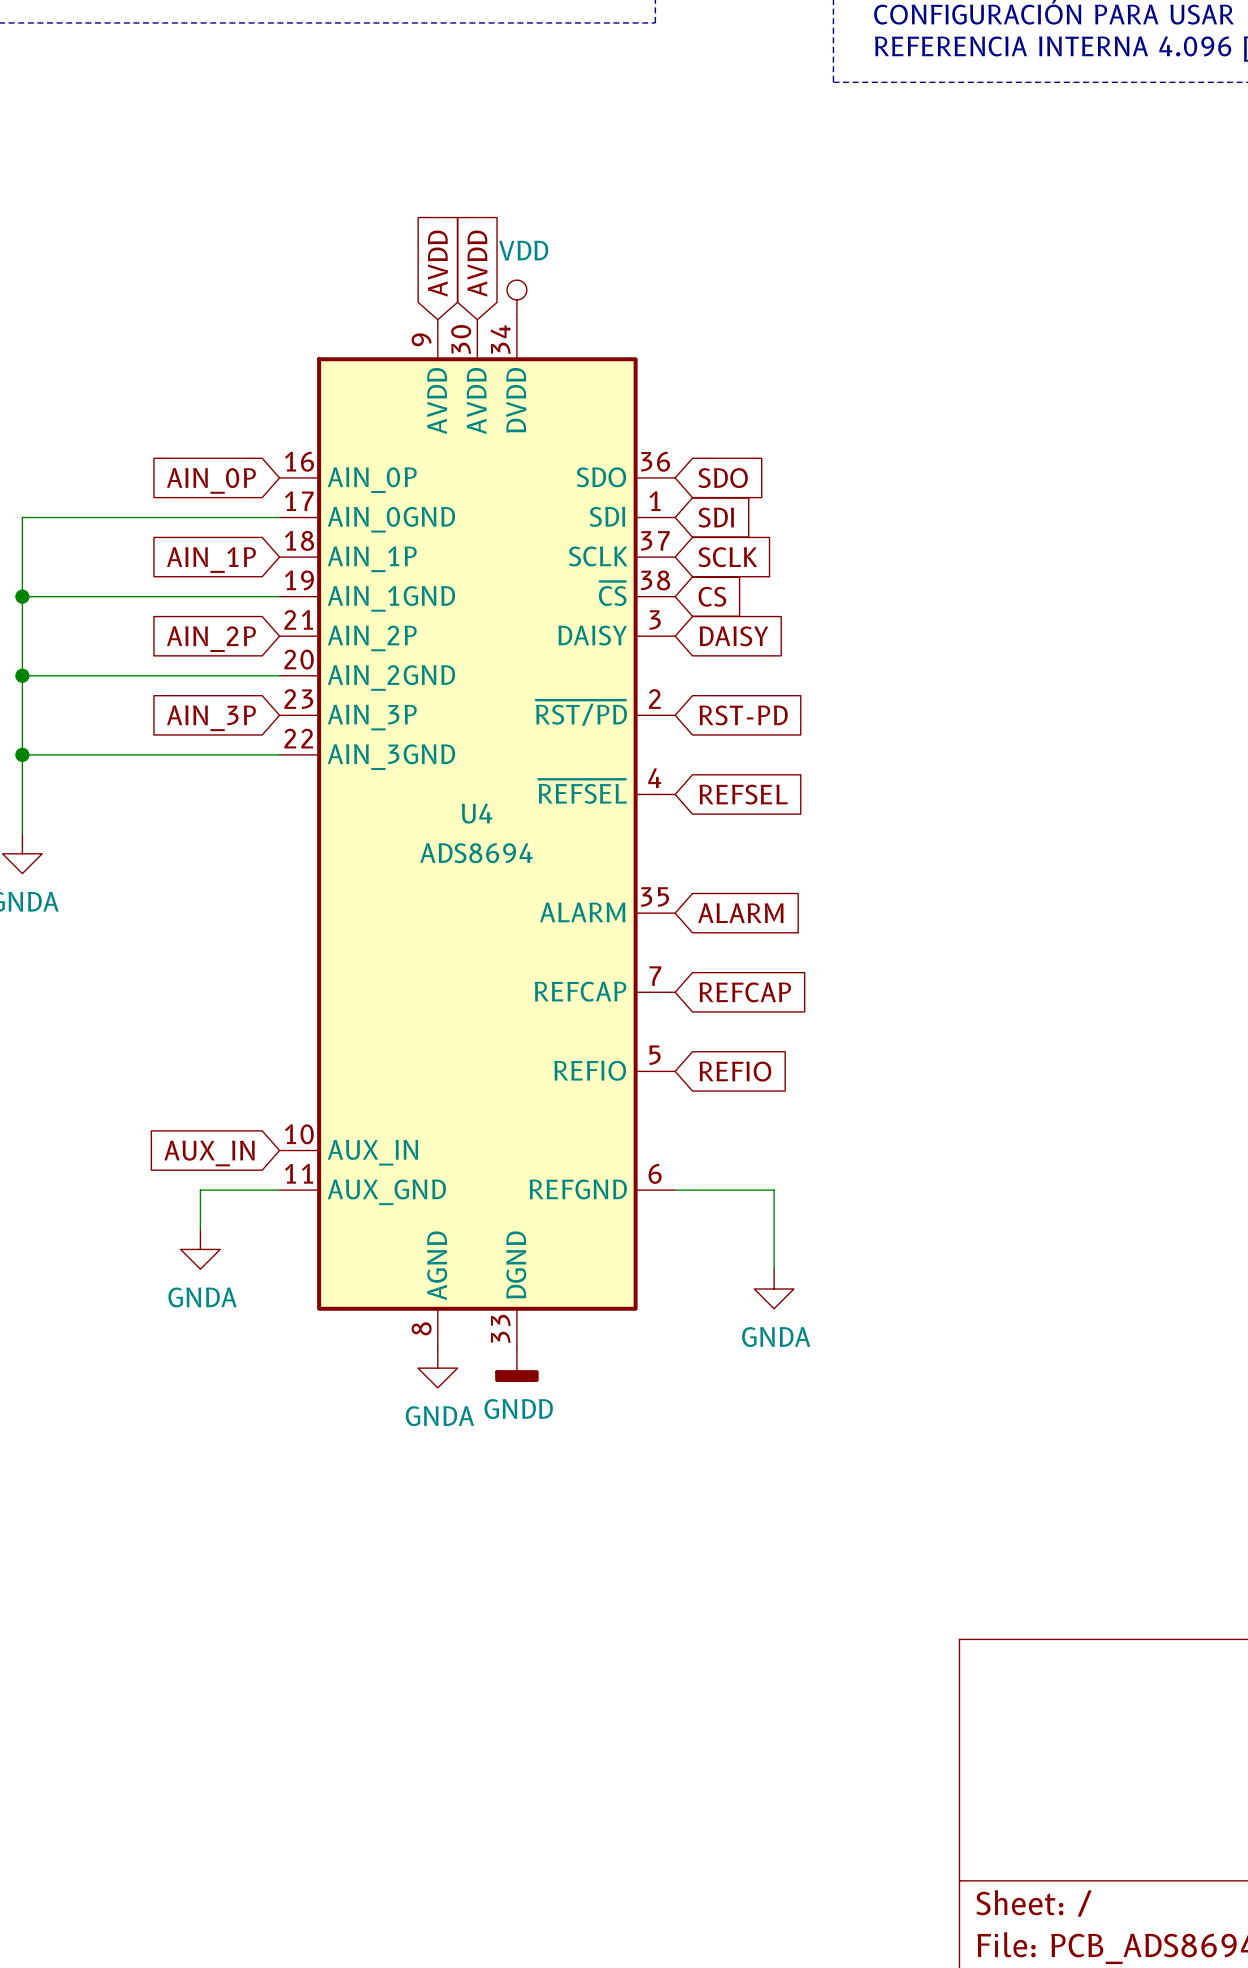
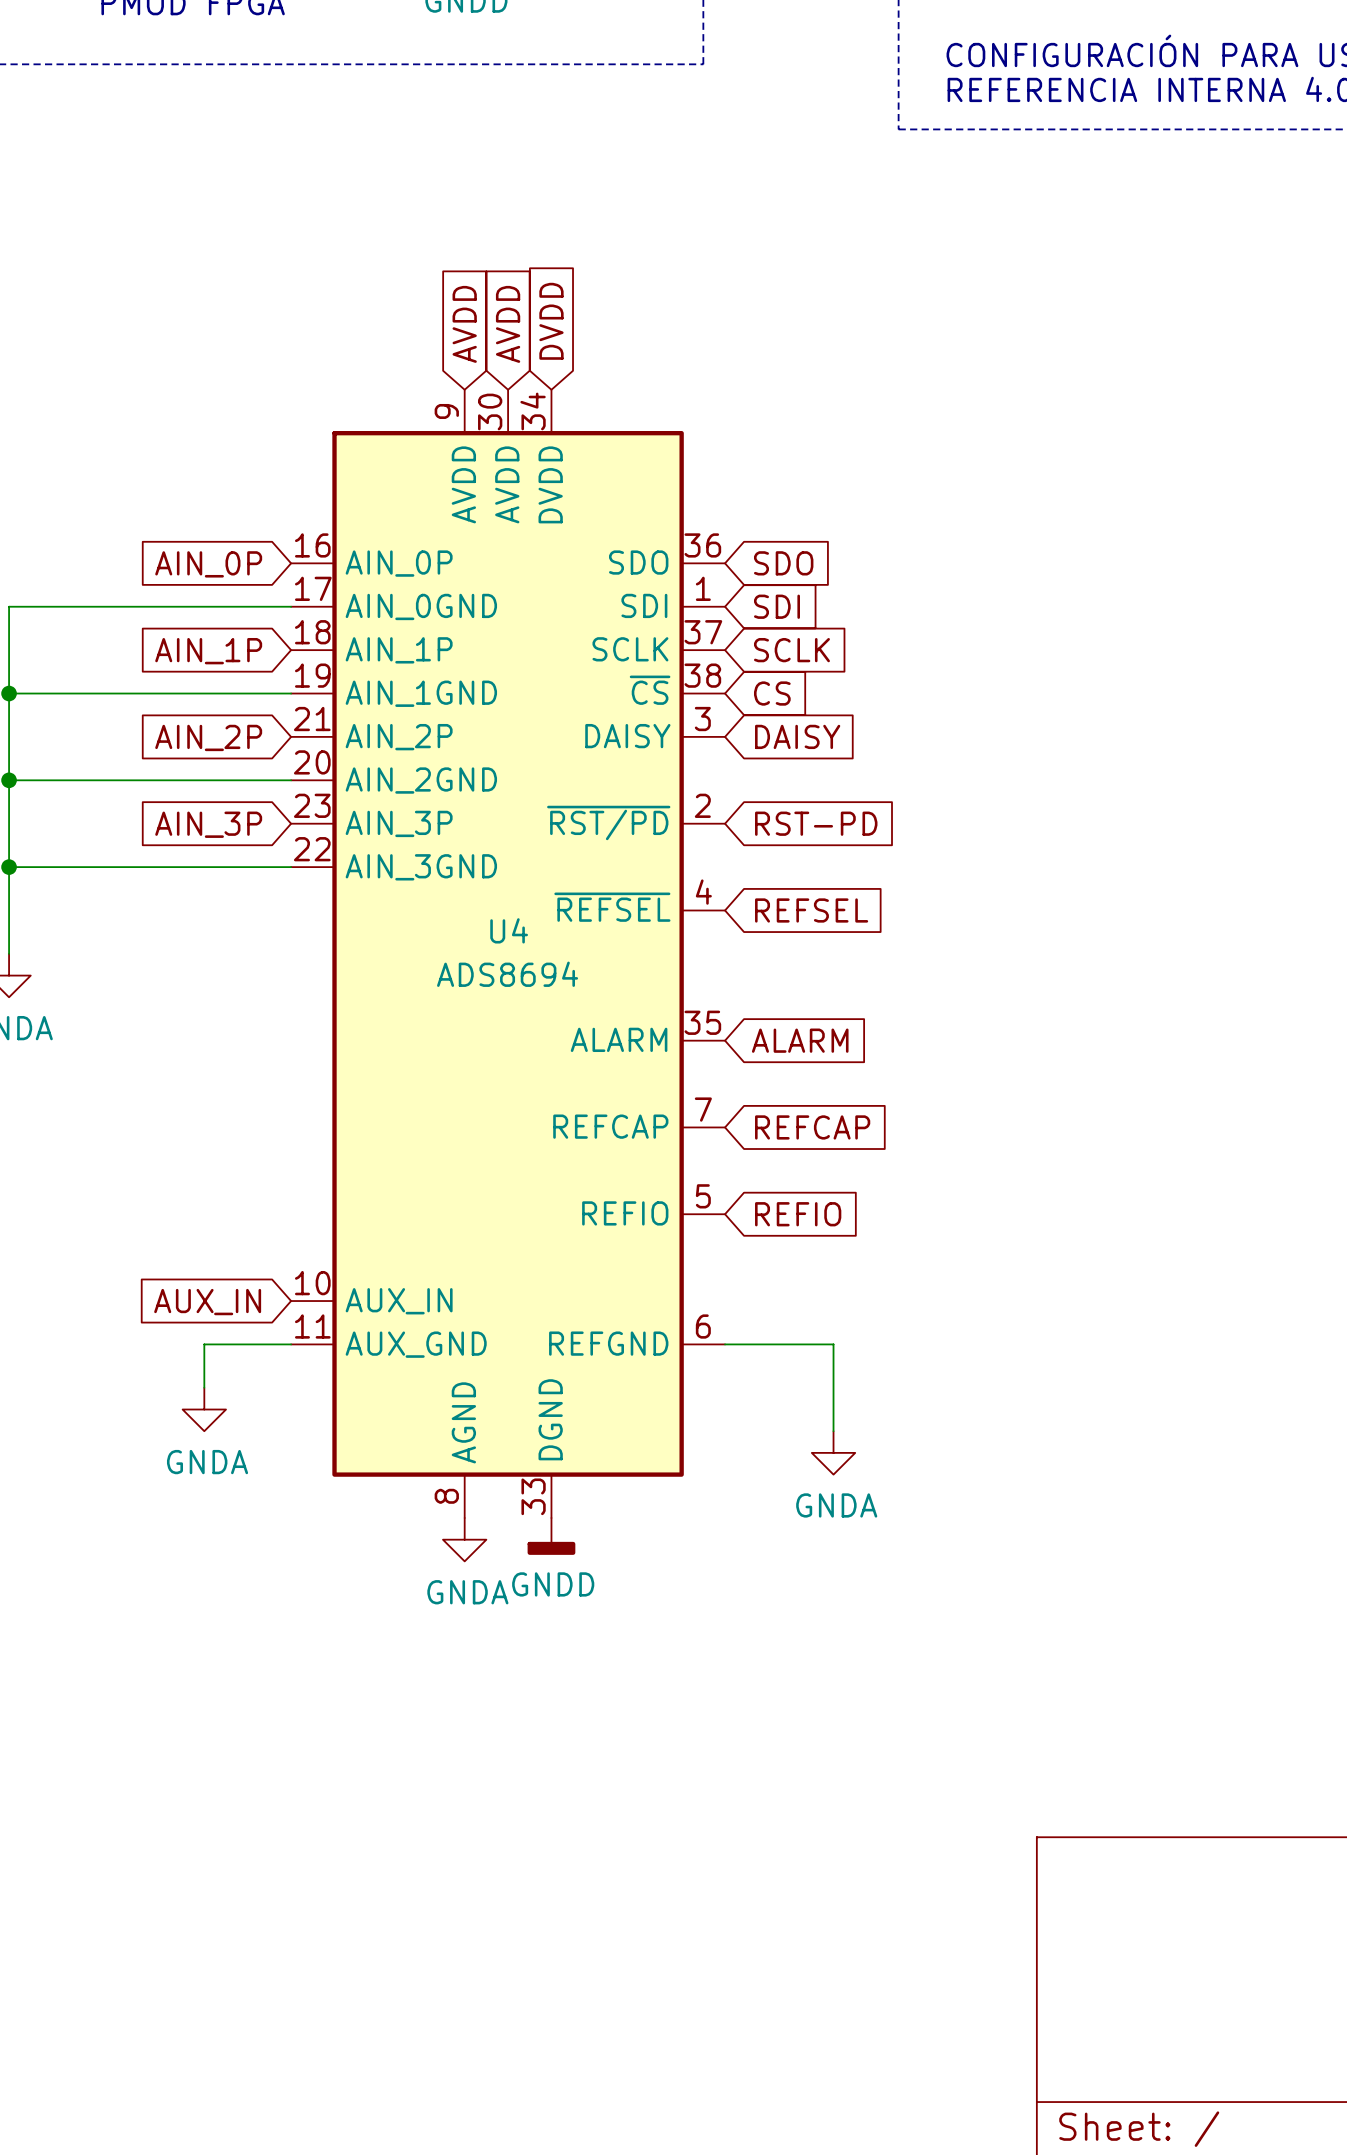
global label: none -> DVDD (551, 321)
power symbol: VDD (516, 299) -> none

